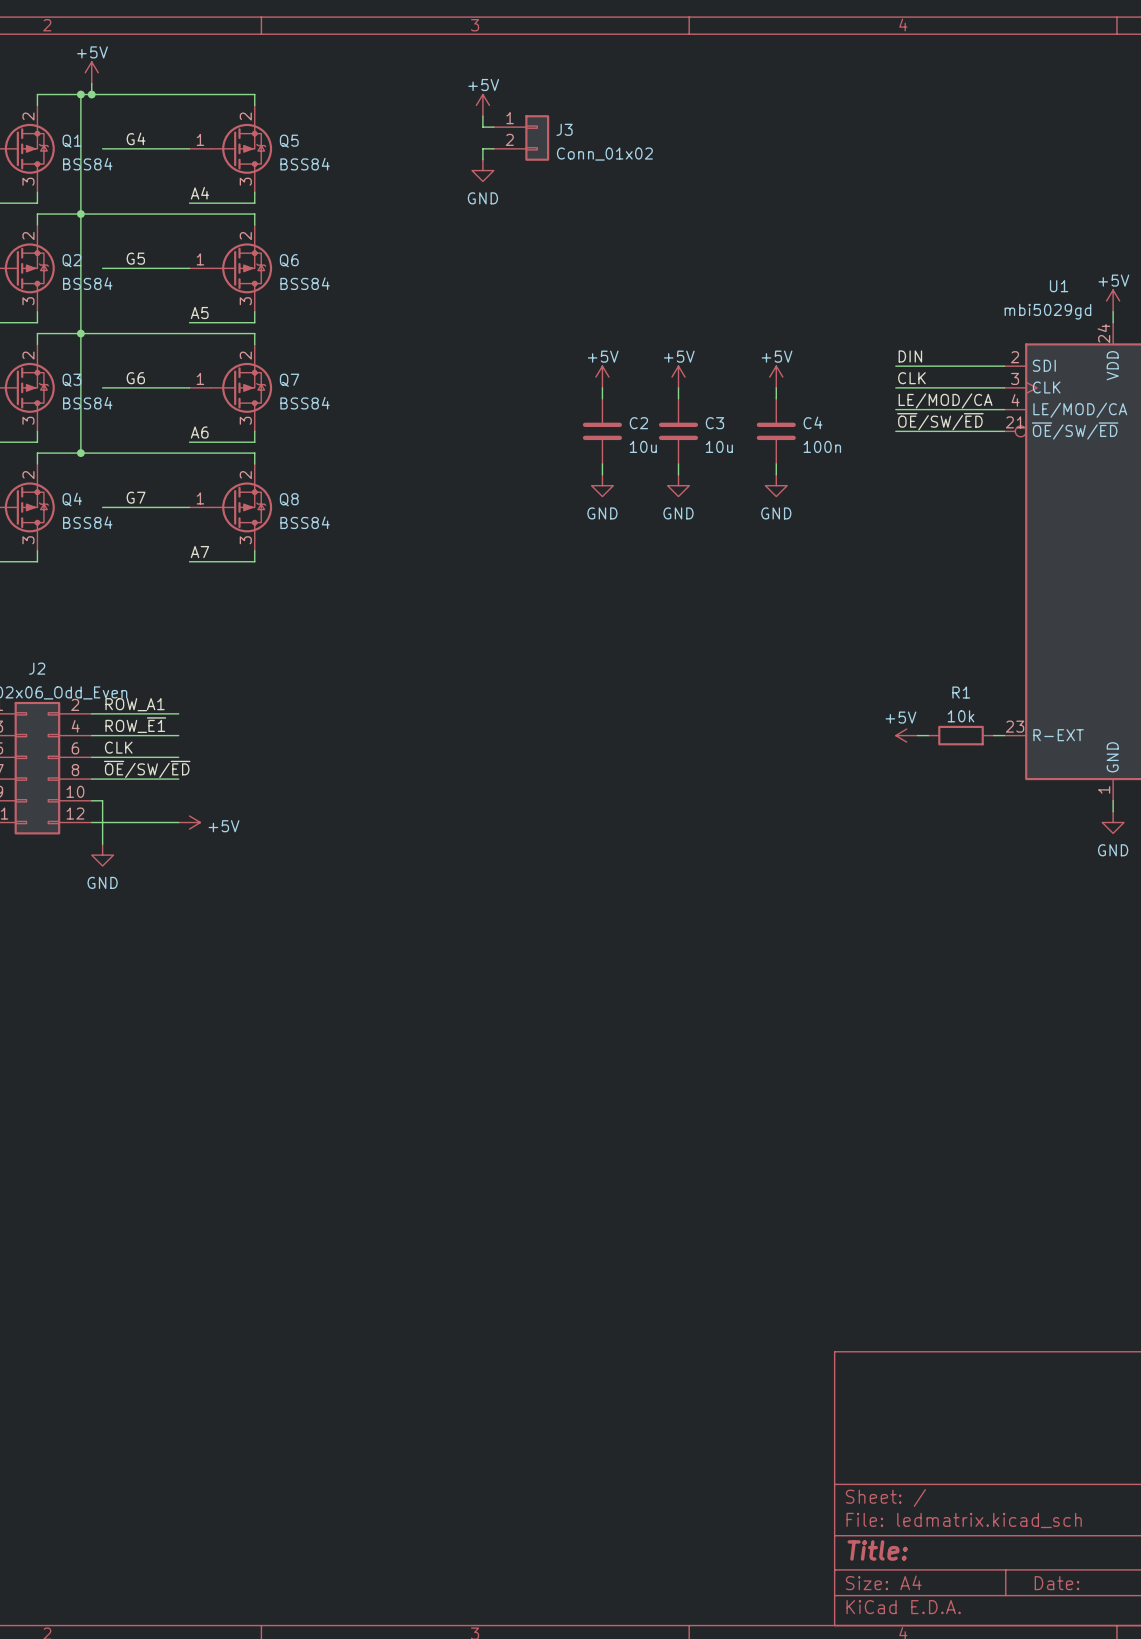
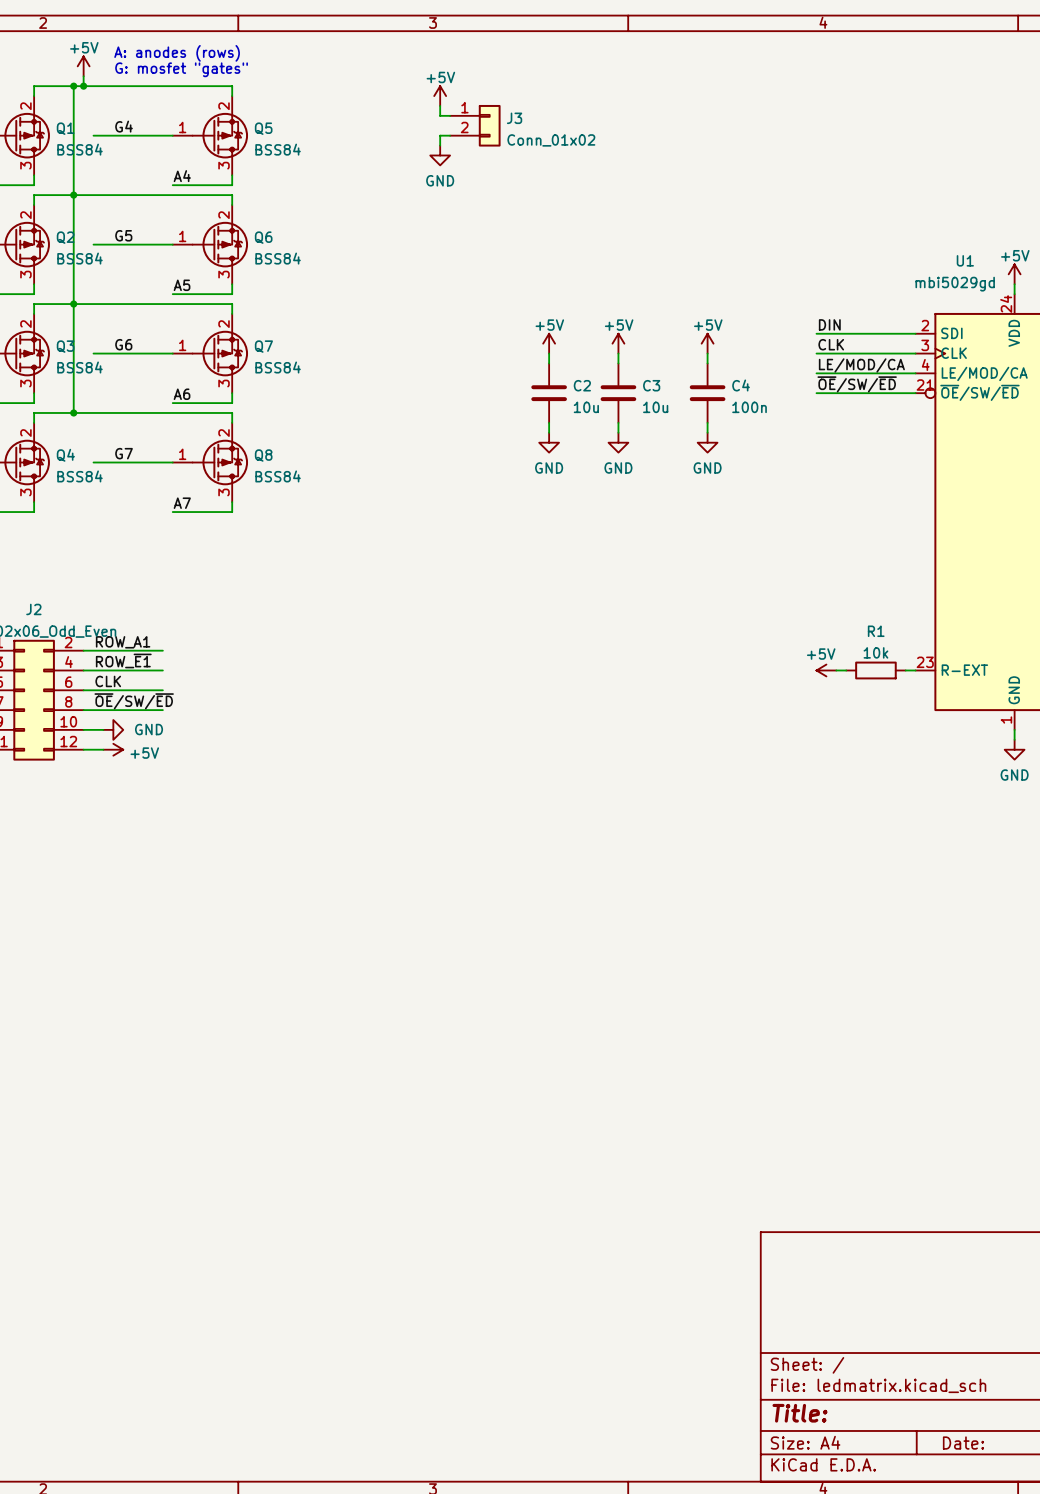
text: none -> A: anodes (rows) (177, 53)
text: none -> G: mosfet "gates" (181, 69)
wire: (102, 800) (102, 844) -> (93, 729) (103, 729)
wire: (113, 822) (178, 822) -> none
power symbol position: +5V (189, 822) -> +5V (113, 749)
power symbol rotation: 0° (102, 855) -> 90° counterclockwise (113, 729)
power symbol position: GND (102, 855) -> GND (113, 729)

